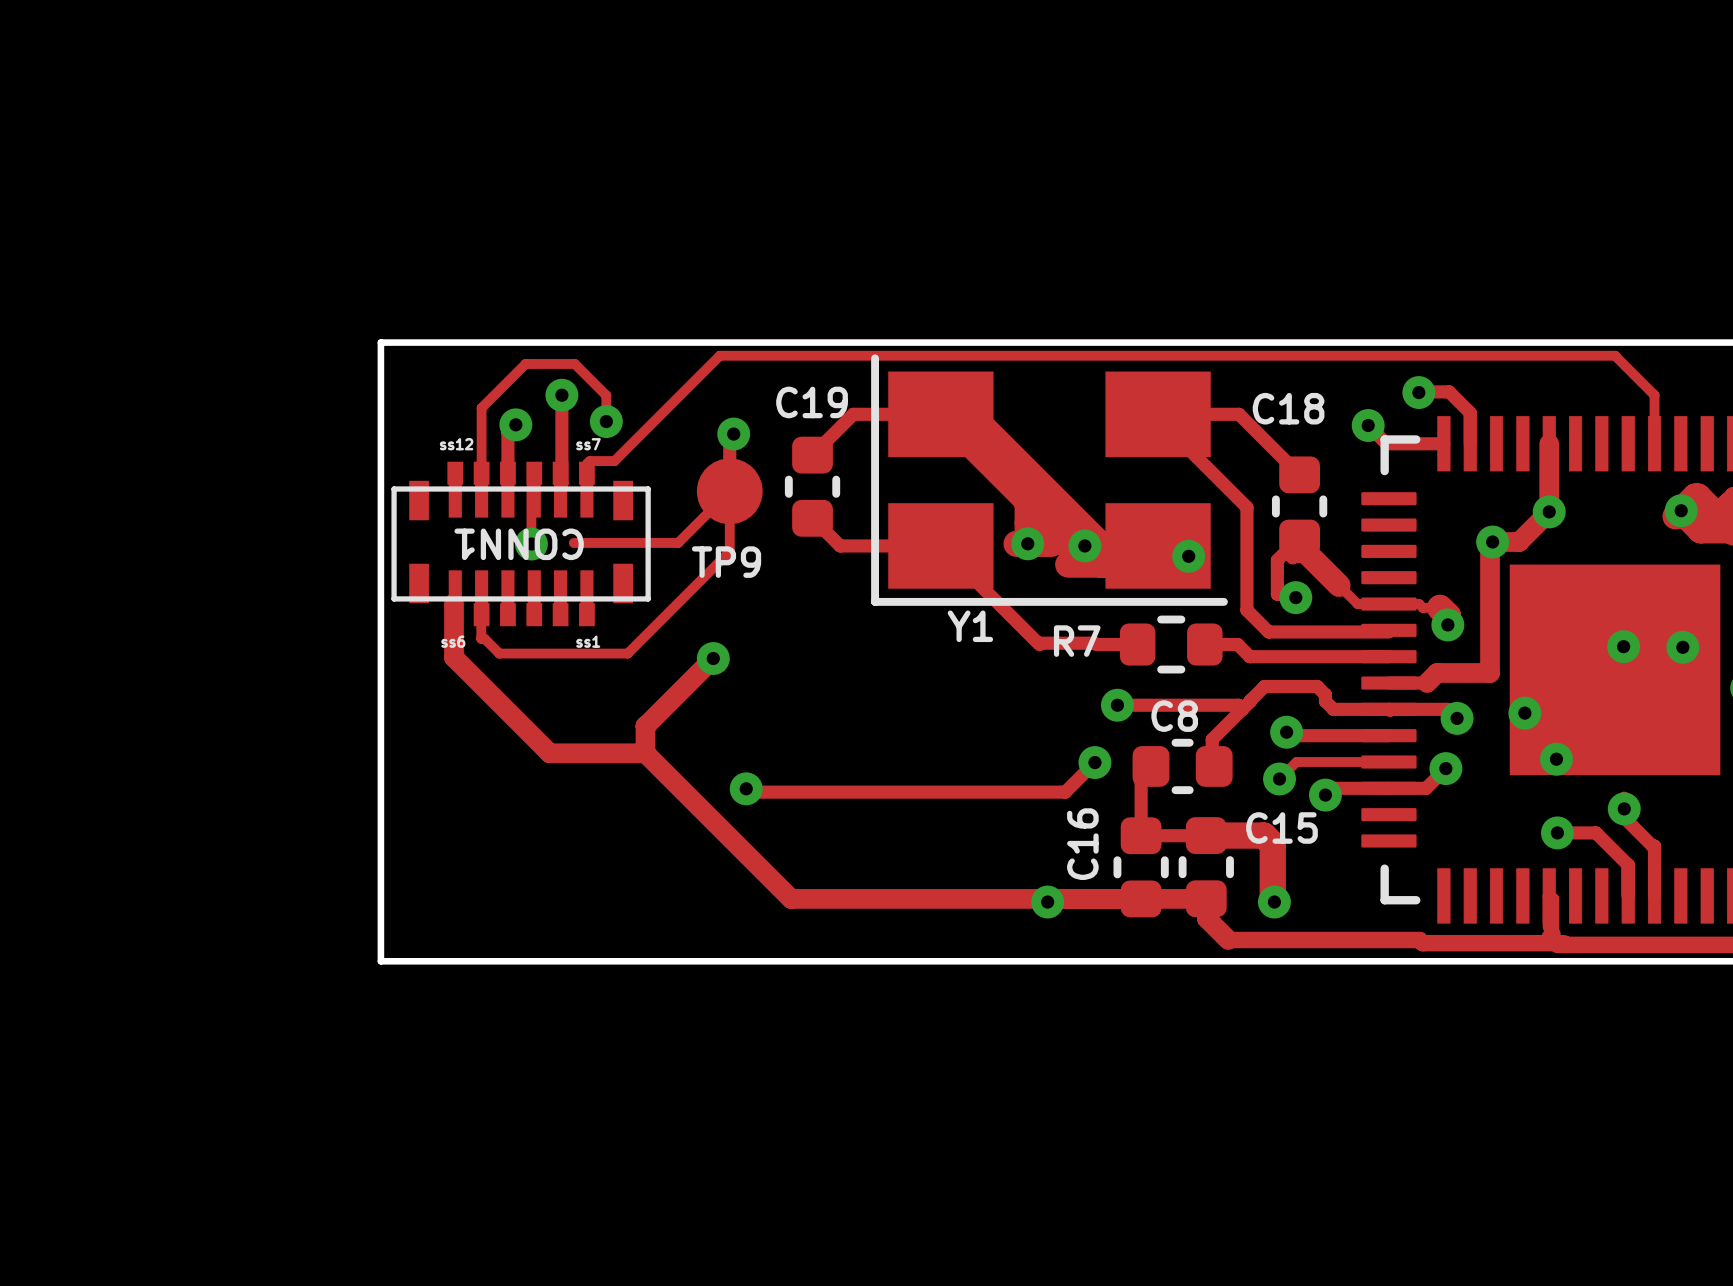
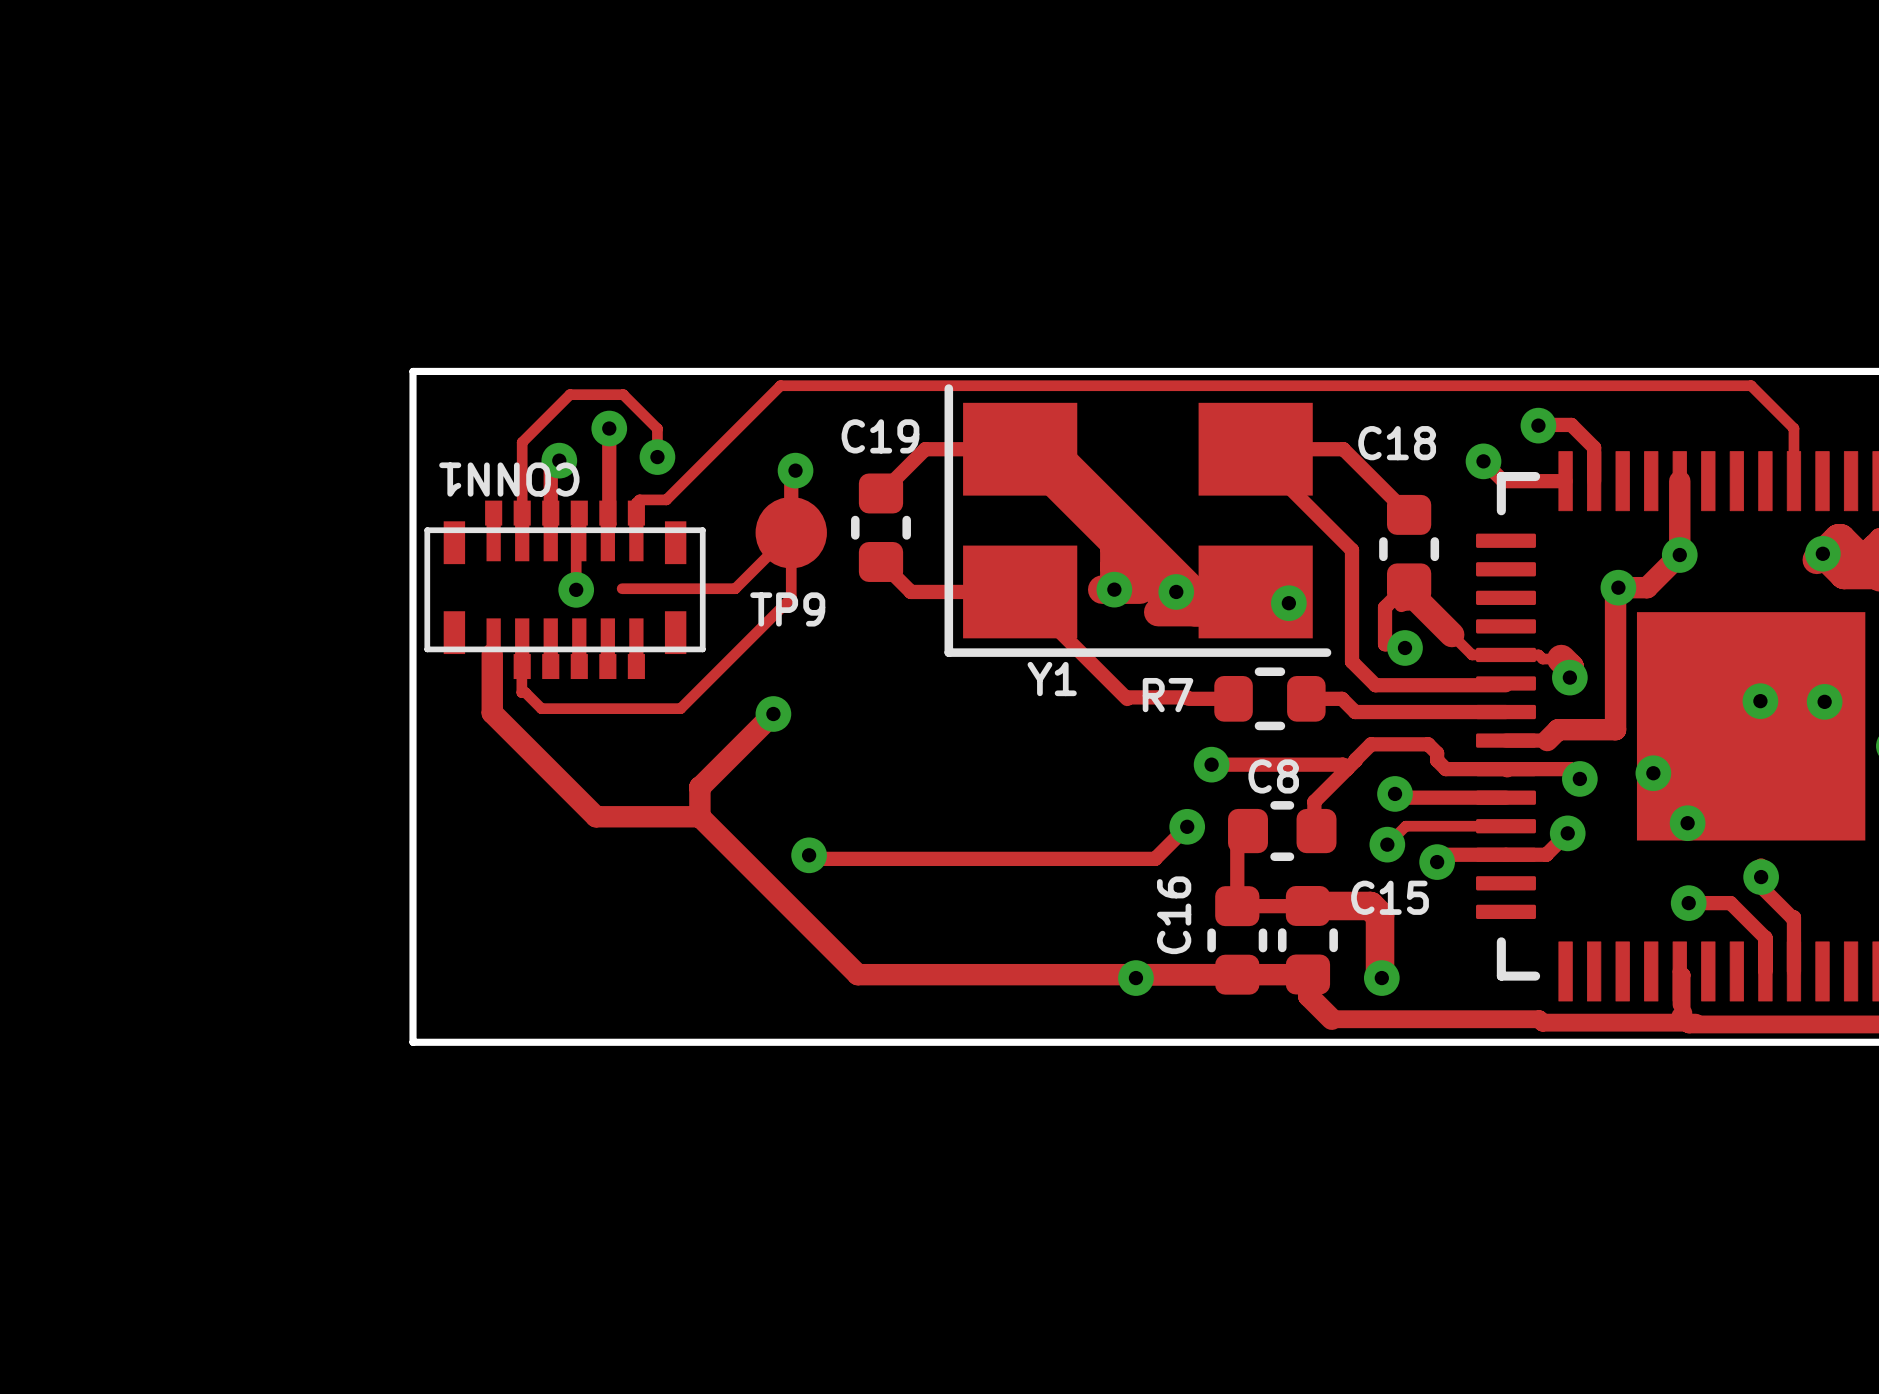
text: ss12 (456, 444) -> none
text: ss7 (588, 444) -> none
CONN1 name position: CONN1 (519, 544) -> CONN1 (509, 479)
text: ss6 (453, 641) -> none
text: ss1 (588, 641) -> none

